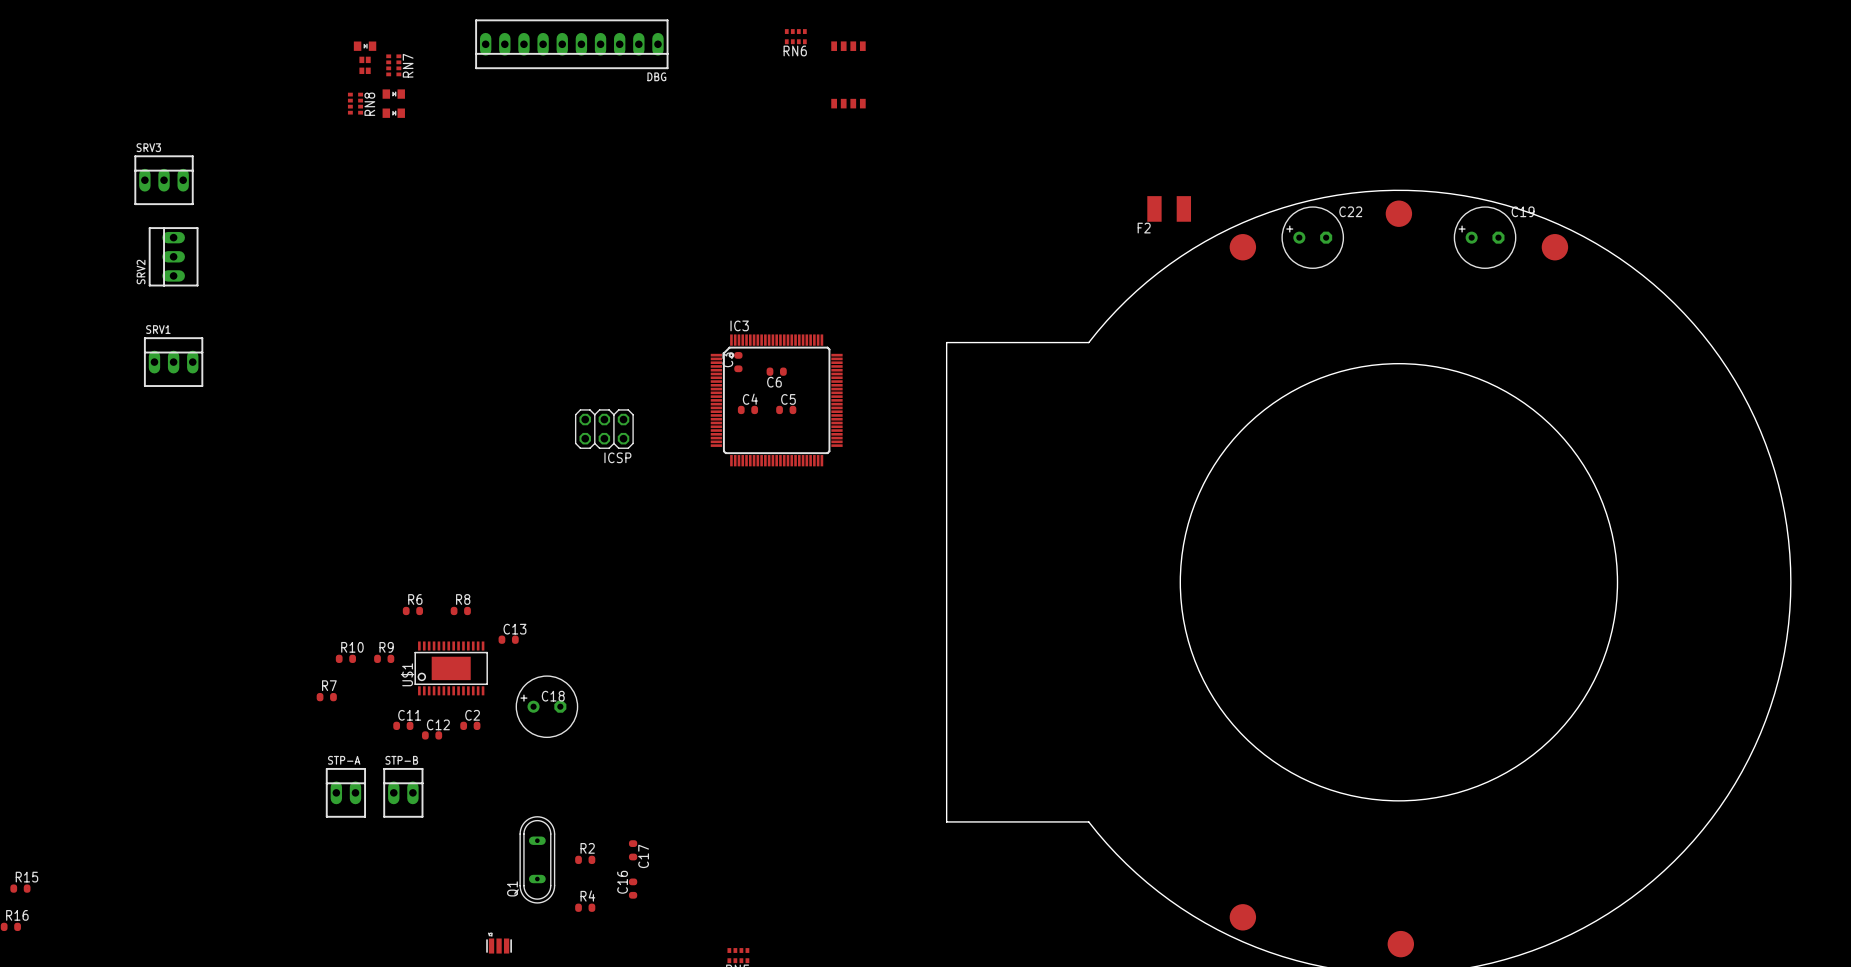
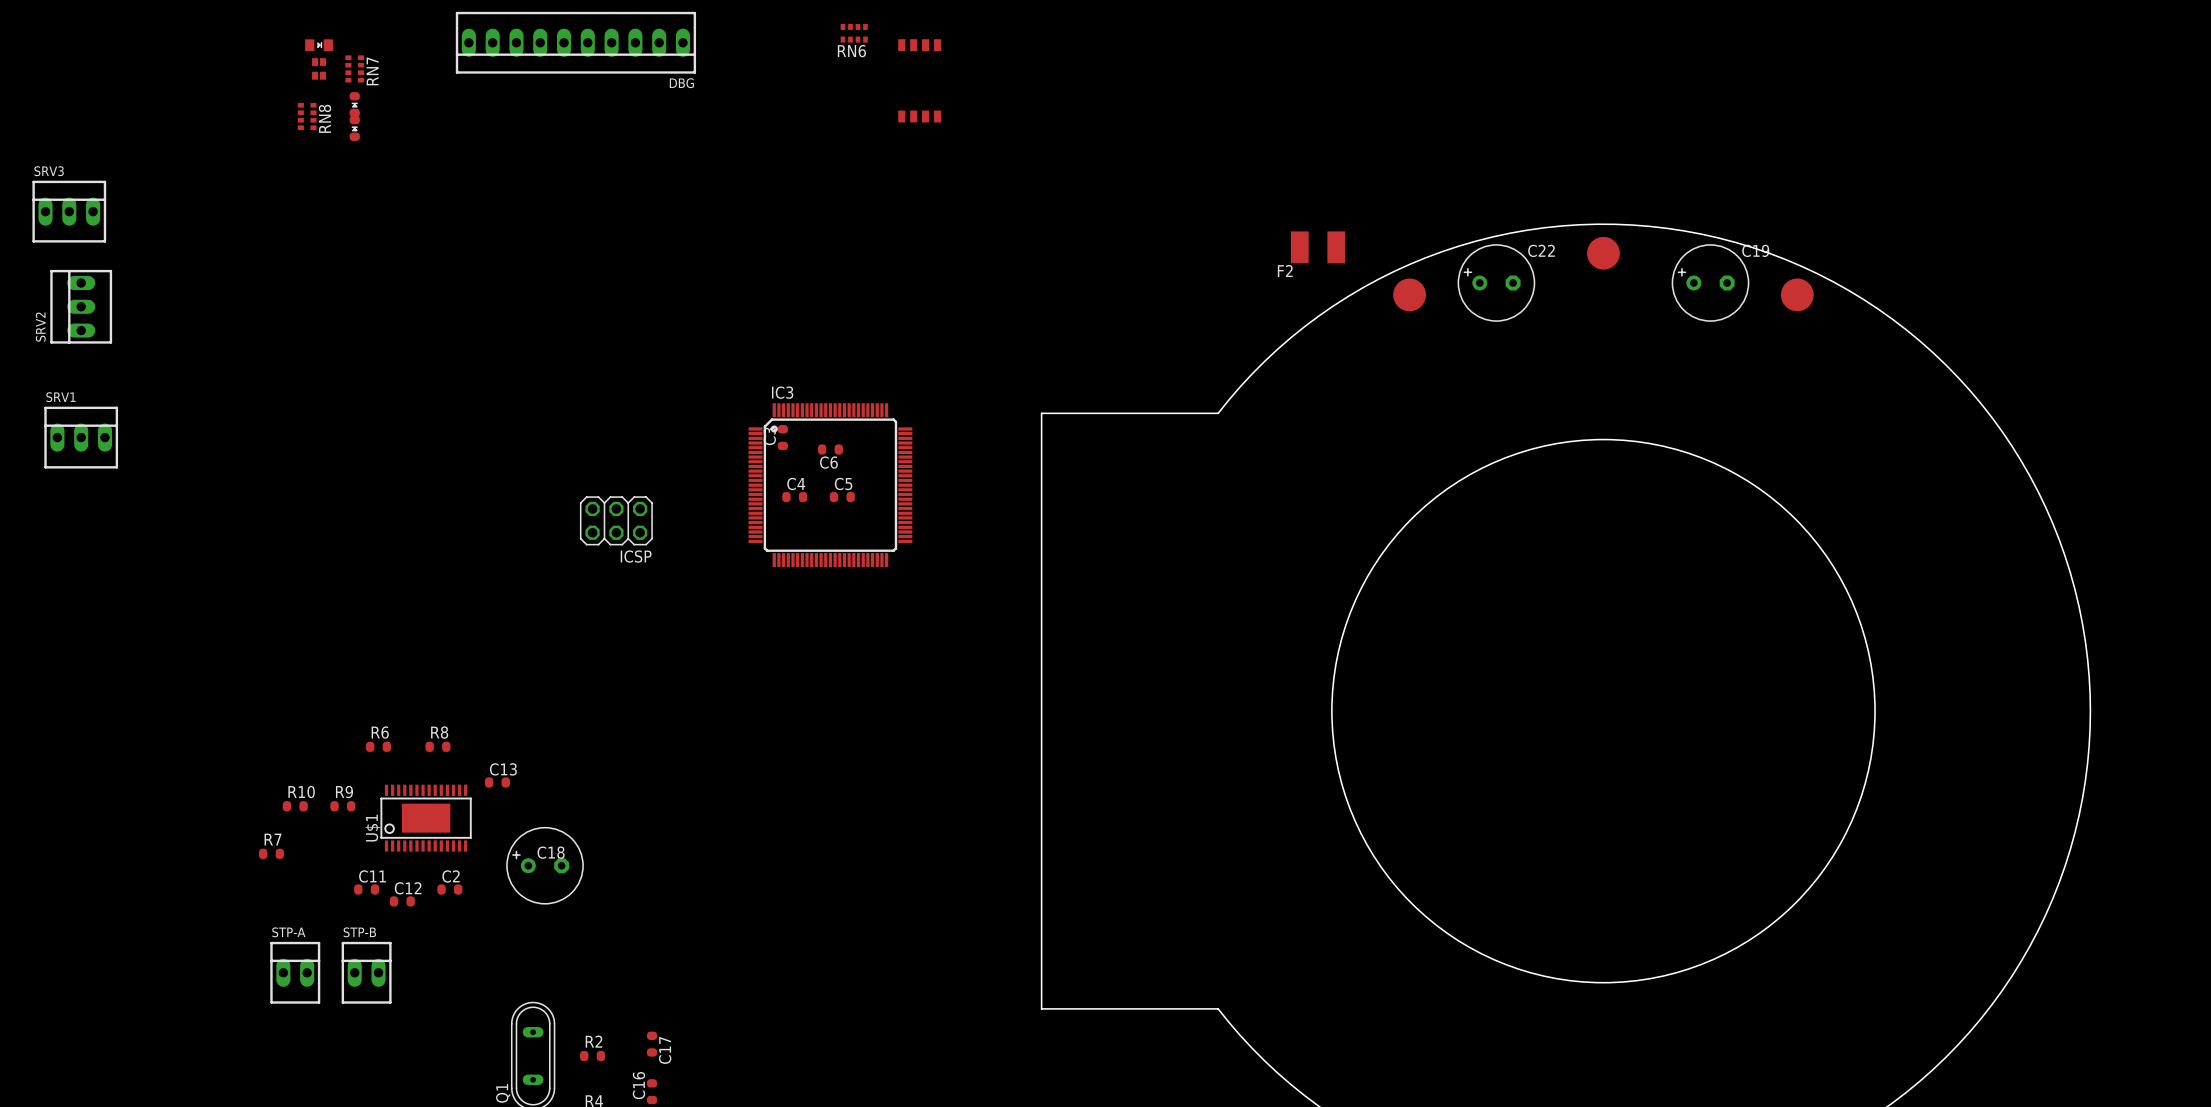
part footprint: [382, 89, 405, 99] -> [349, 92, 360, 118]
part footprint: [382, 108, 405, 118] -> [349, 115, 360, 141]

